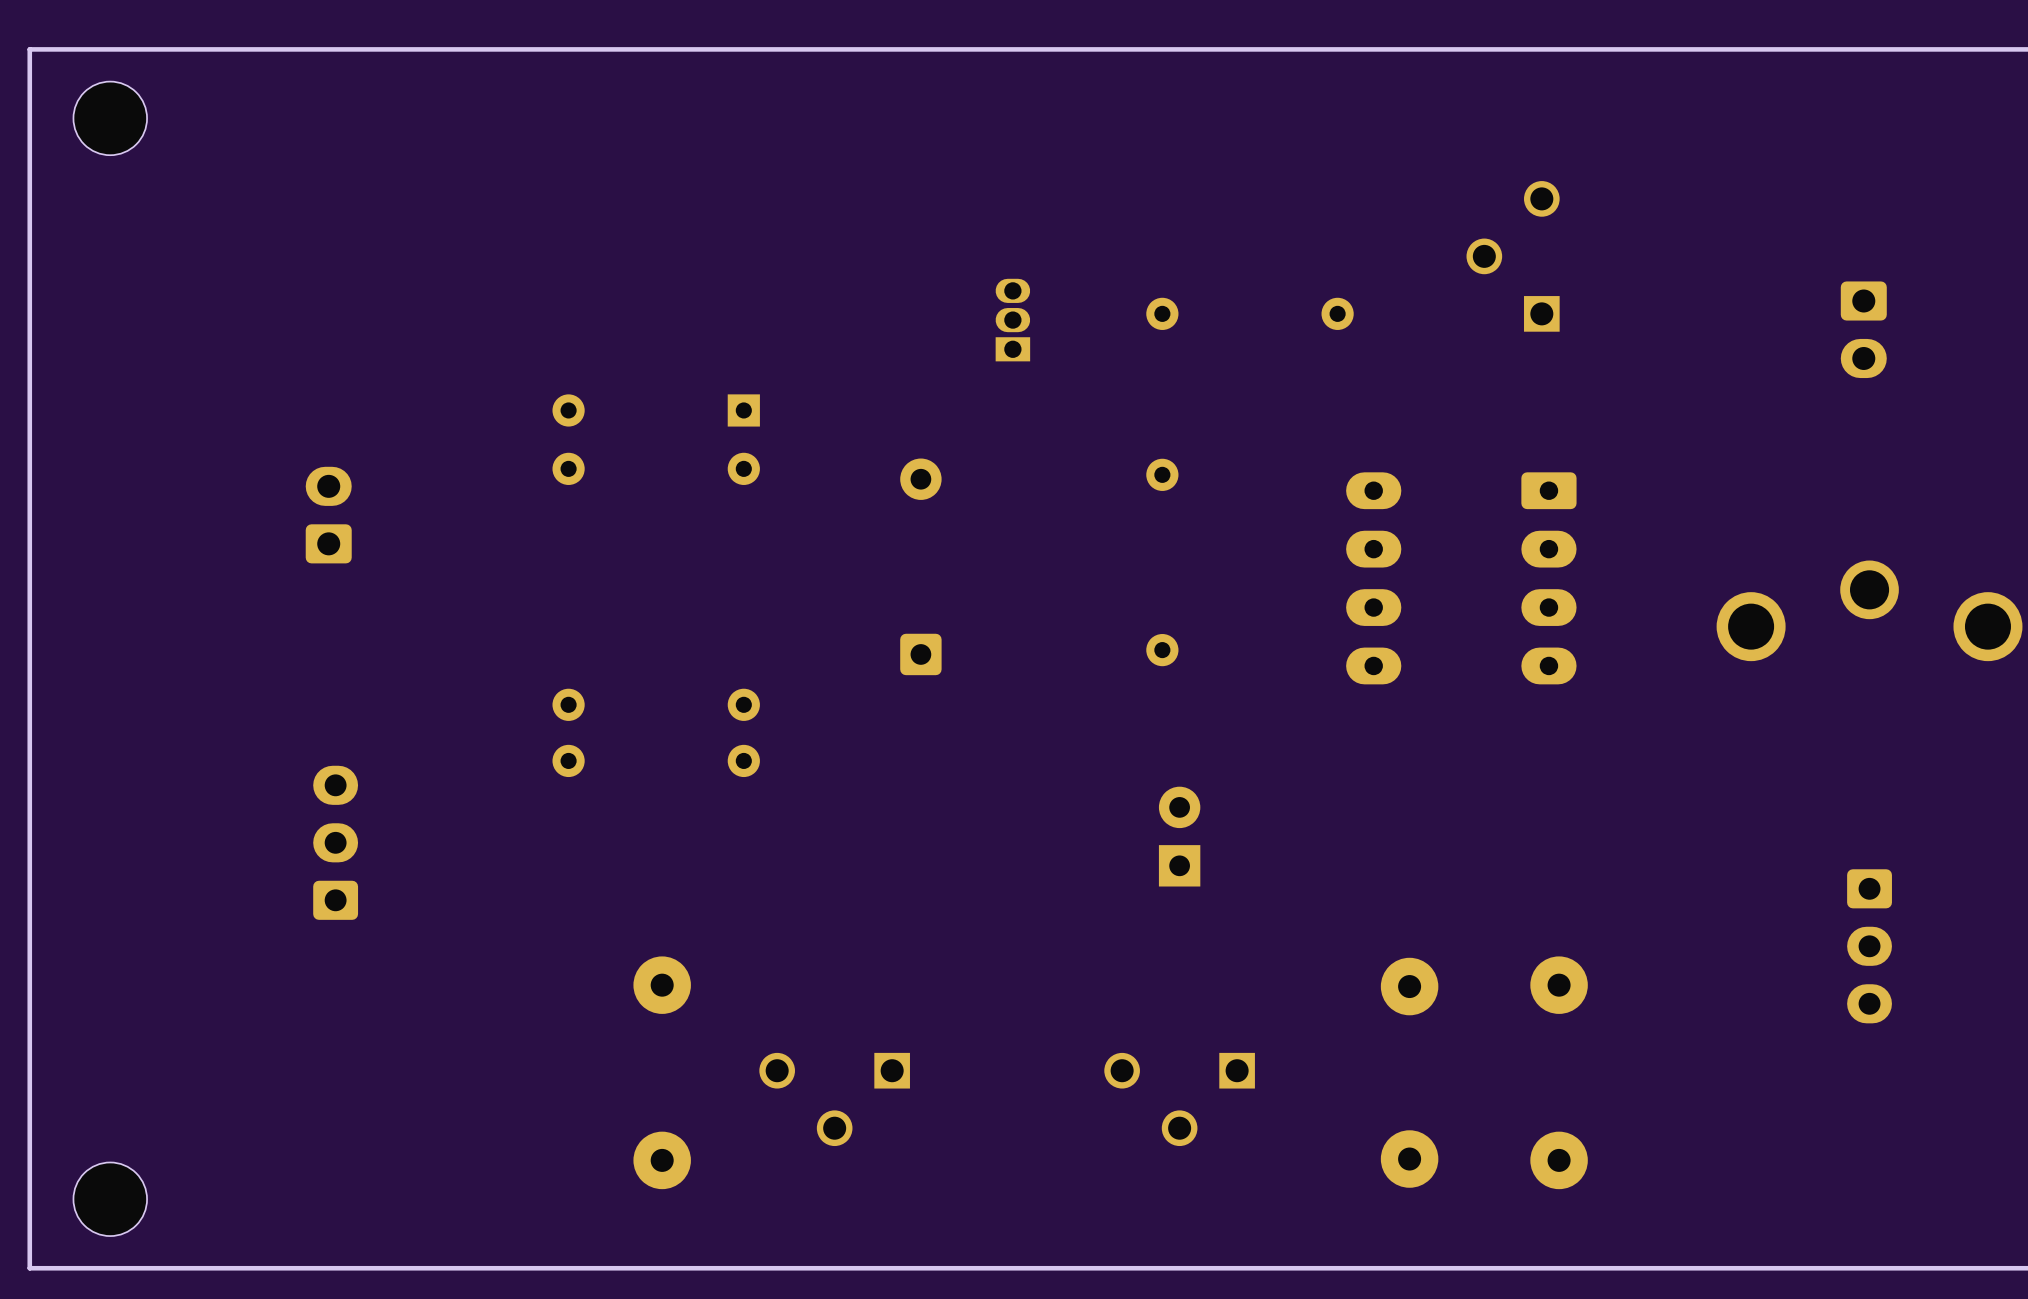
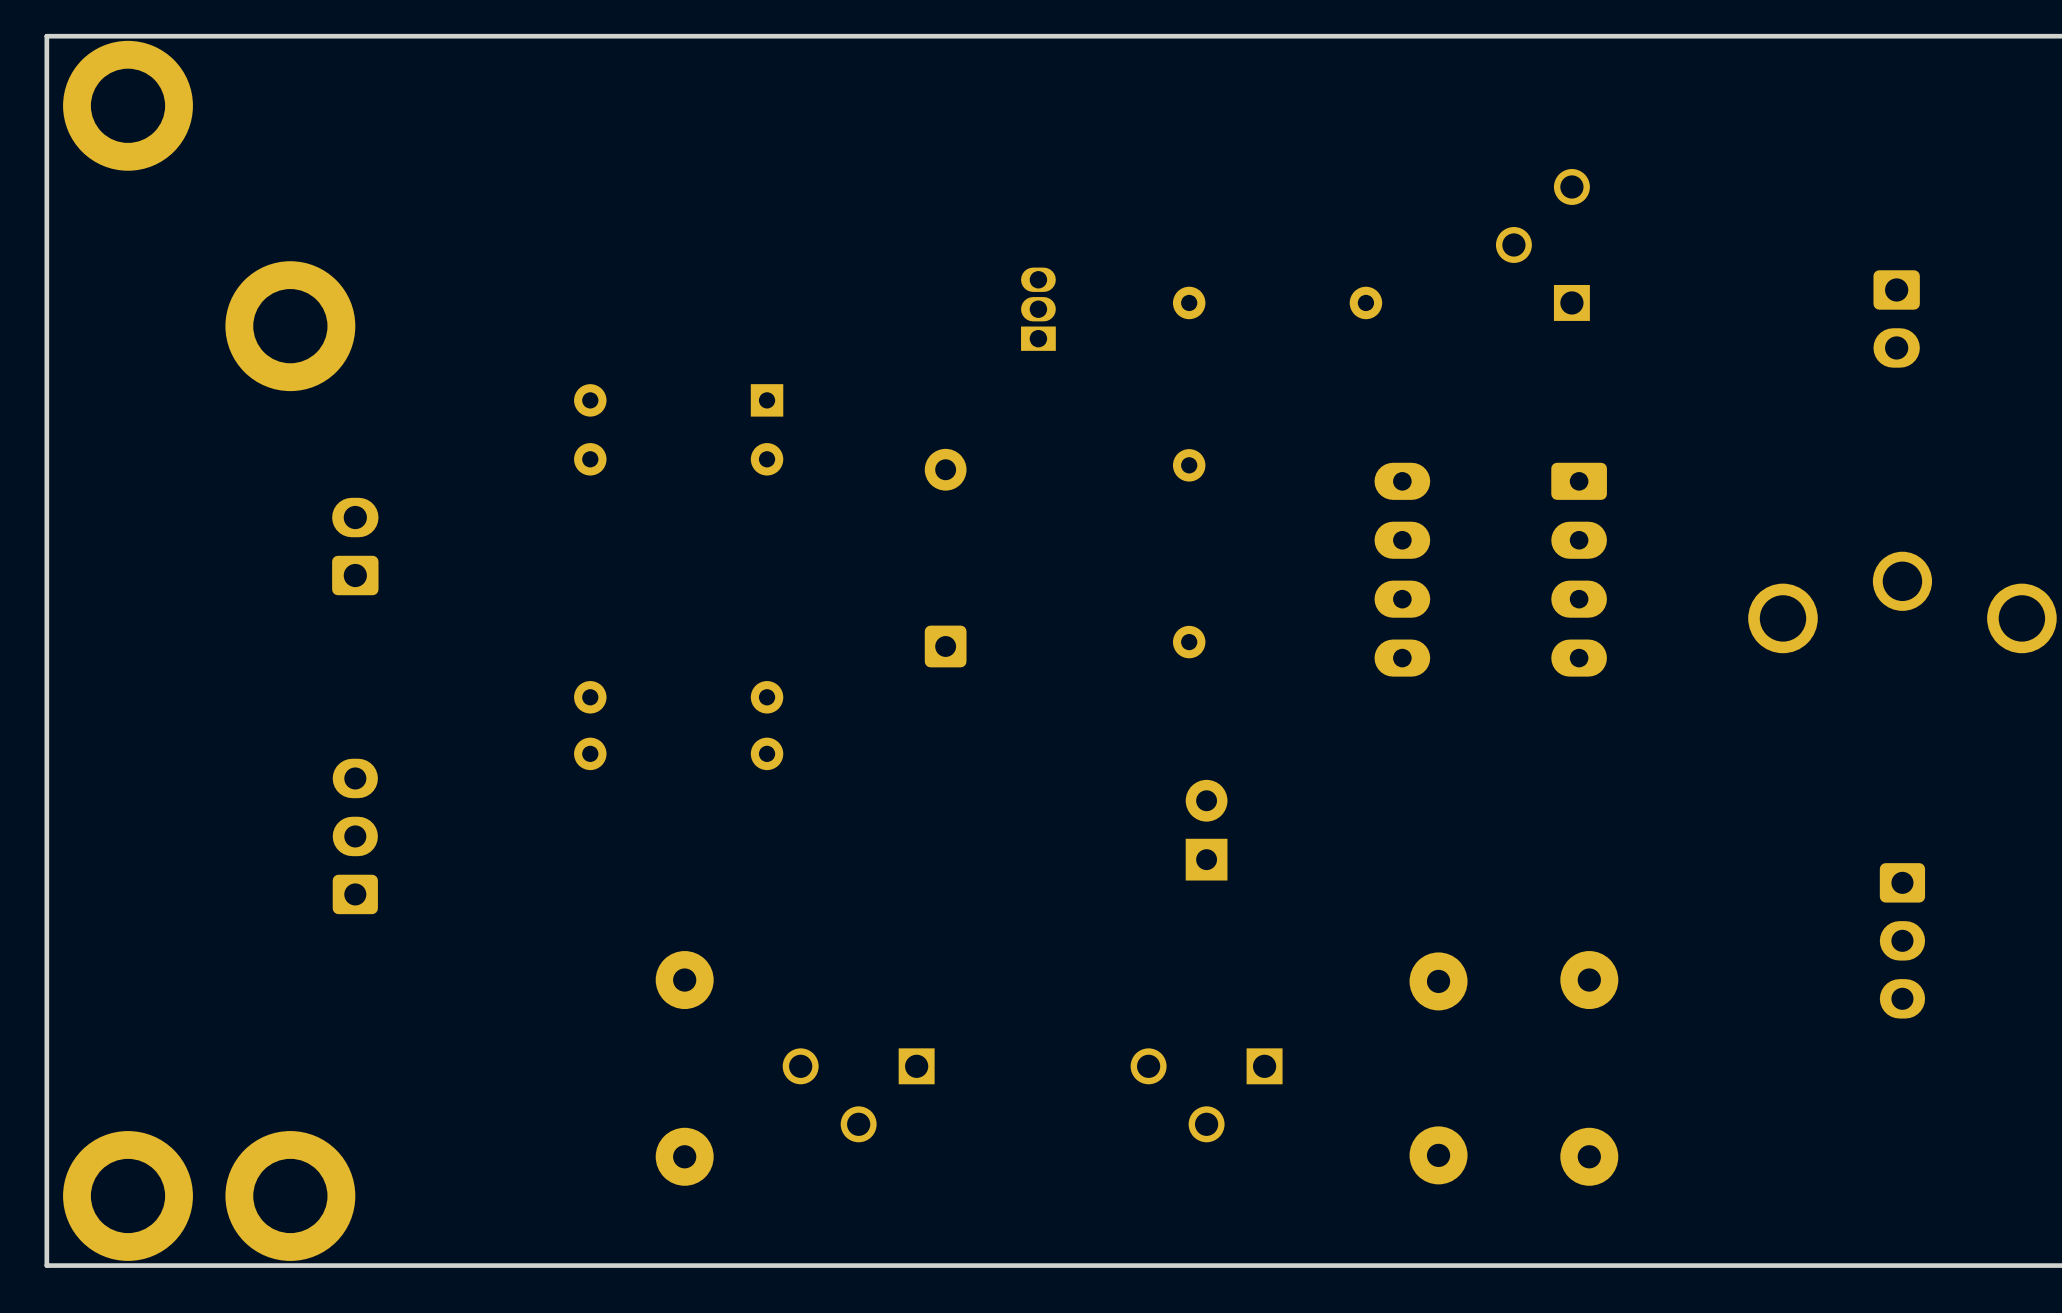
part footprint: [73, 81, 148, 156] -> [63, 40, 193, 171]
part: none -> (290, 326)
part position: (328, 515) -> (355, 546)
part footprint: [73, 1162, 148, 1237] -> [63, 1131, 193, 1261]
part: none -> (290, 1195)

